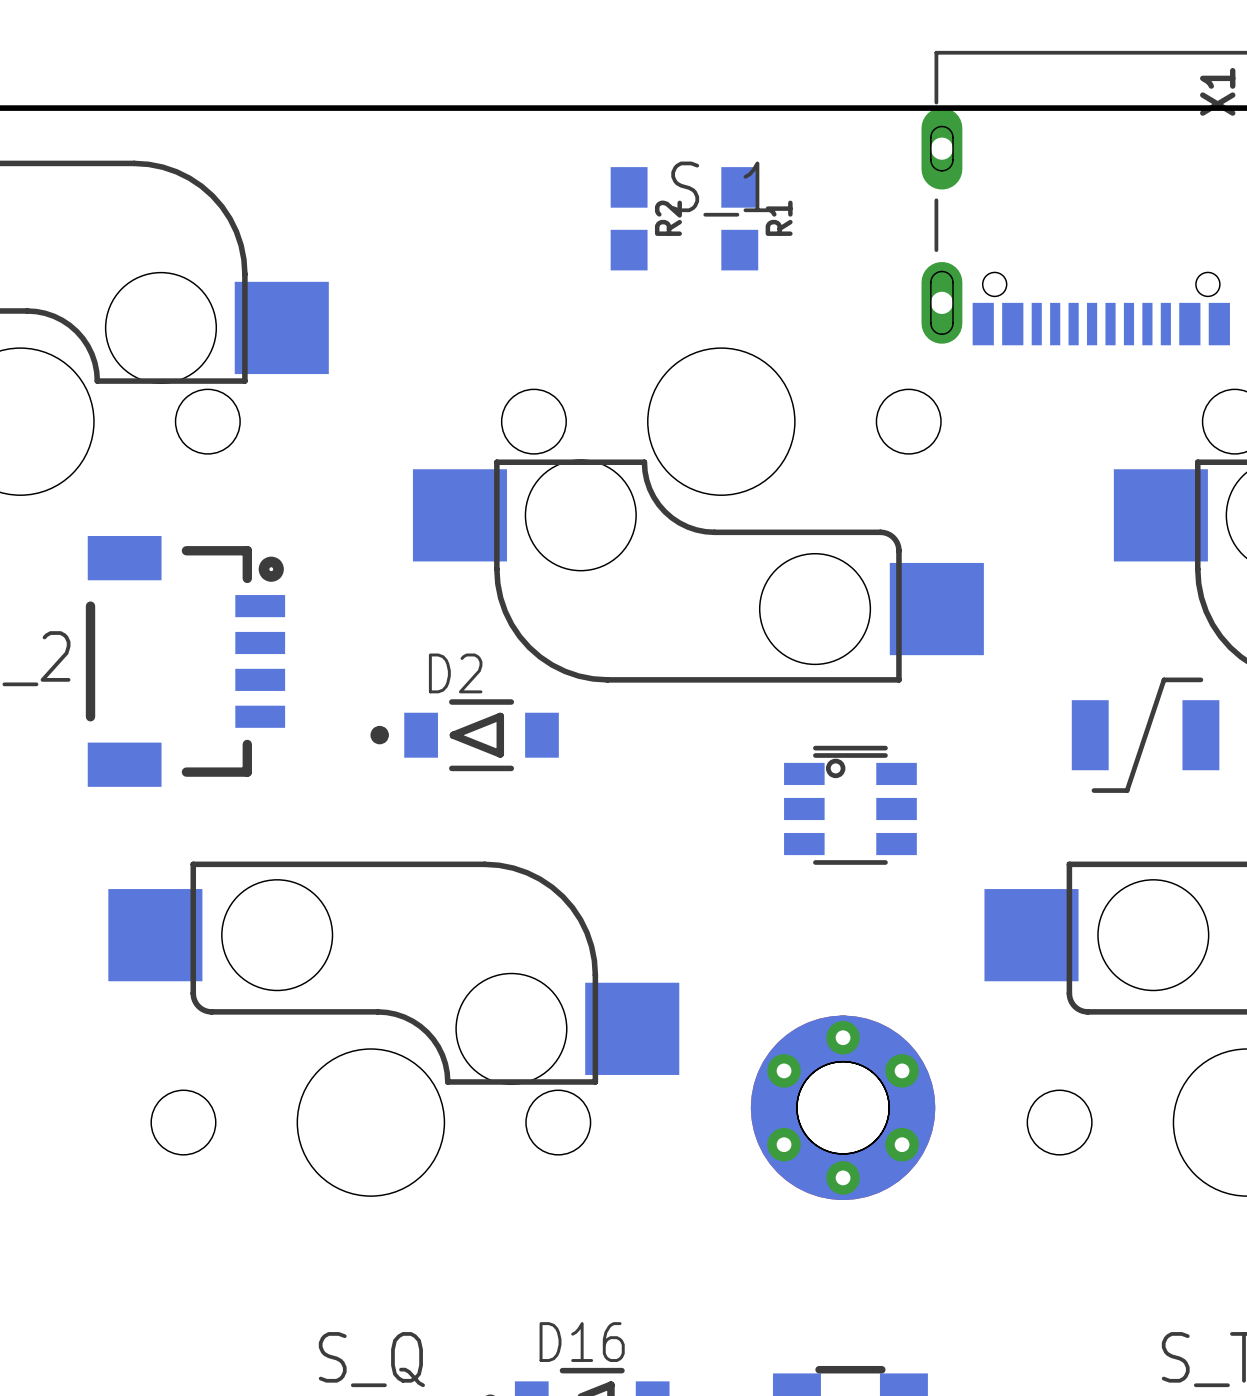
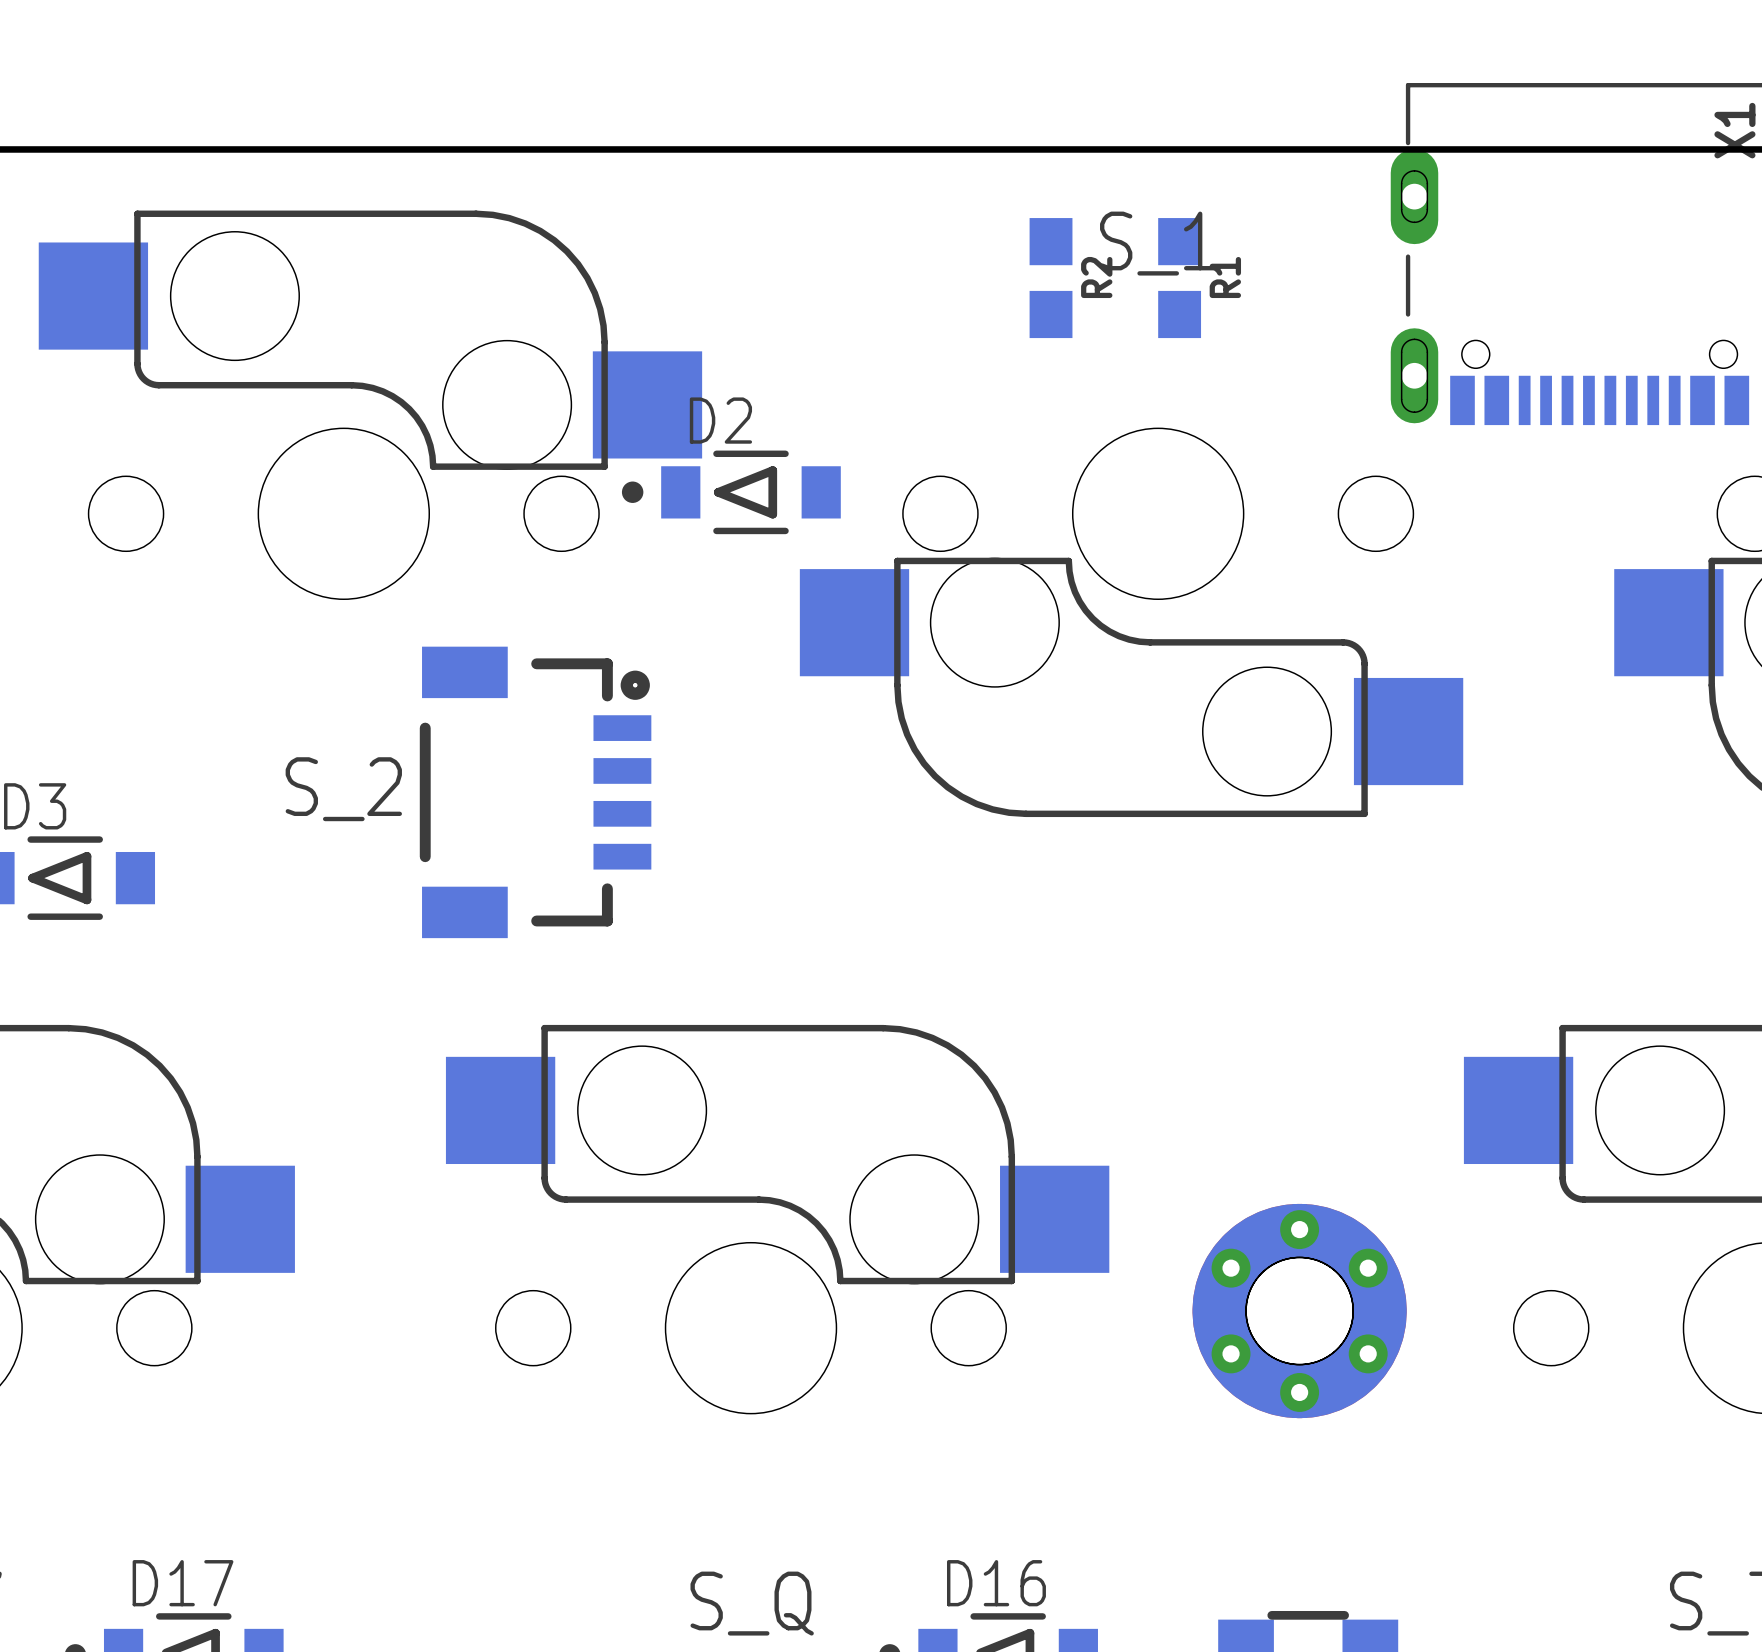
D2 position: (464, 735) -> (731, 492)
part: (1145, 735) -> none
part: (850, 805) -> none

